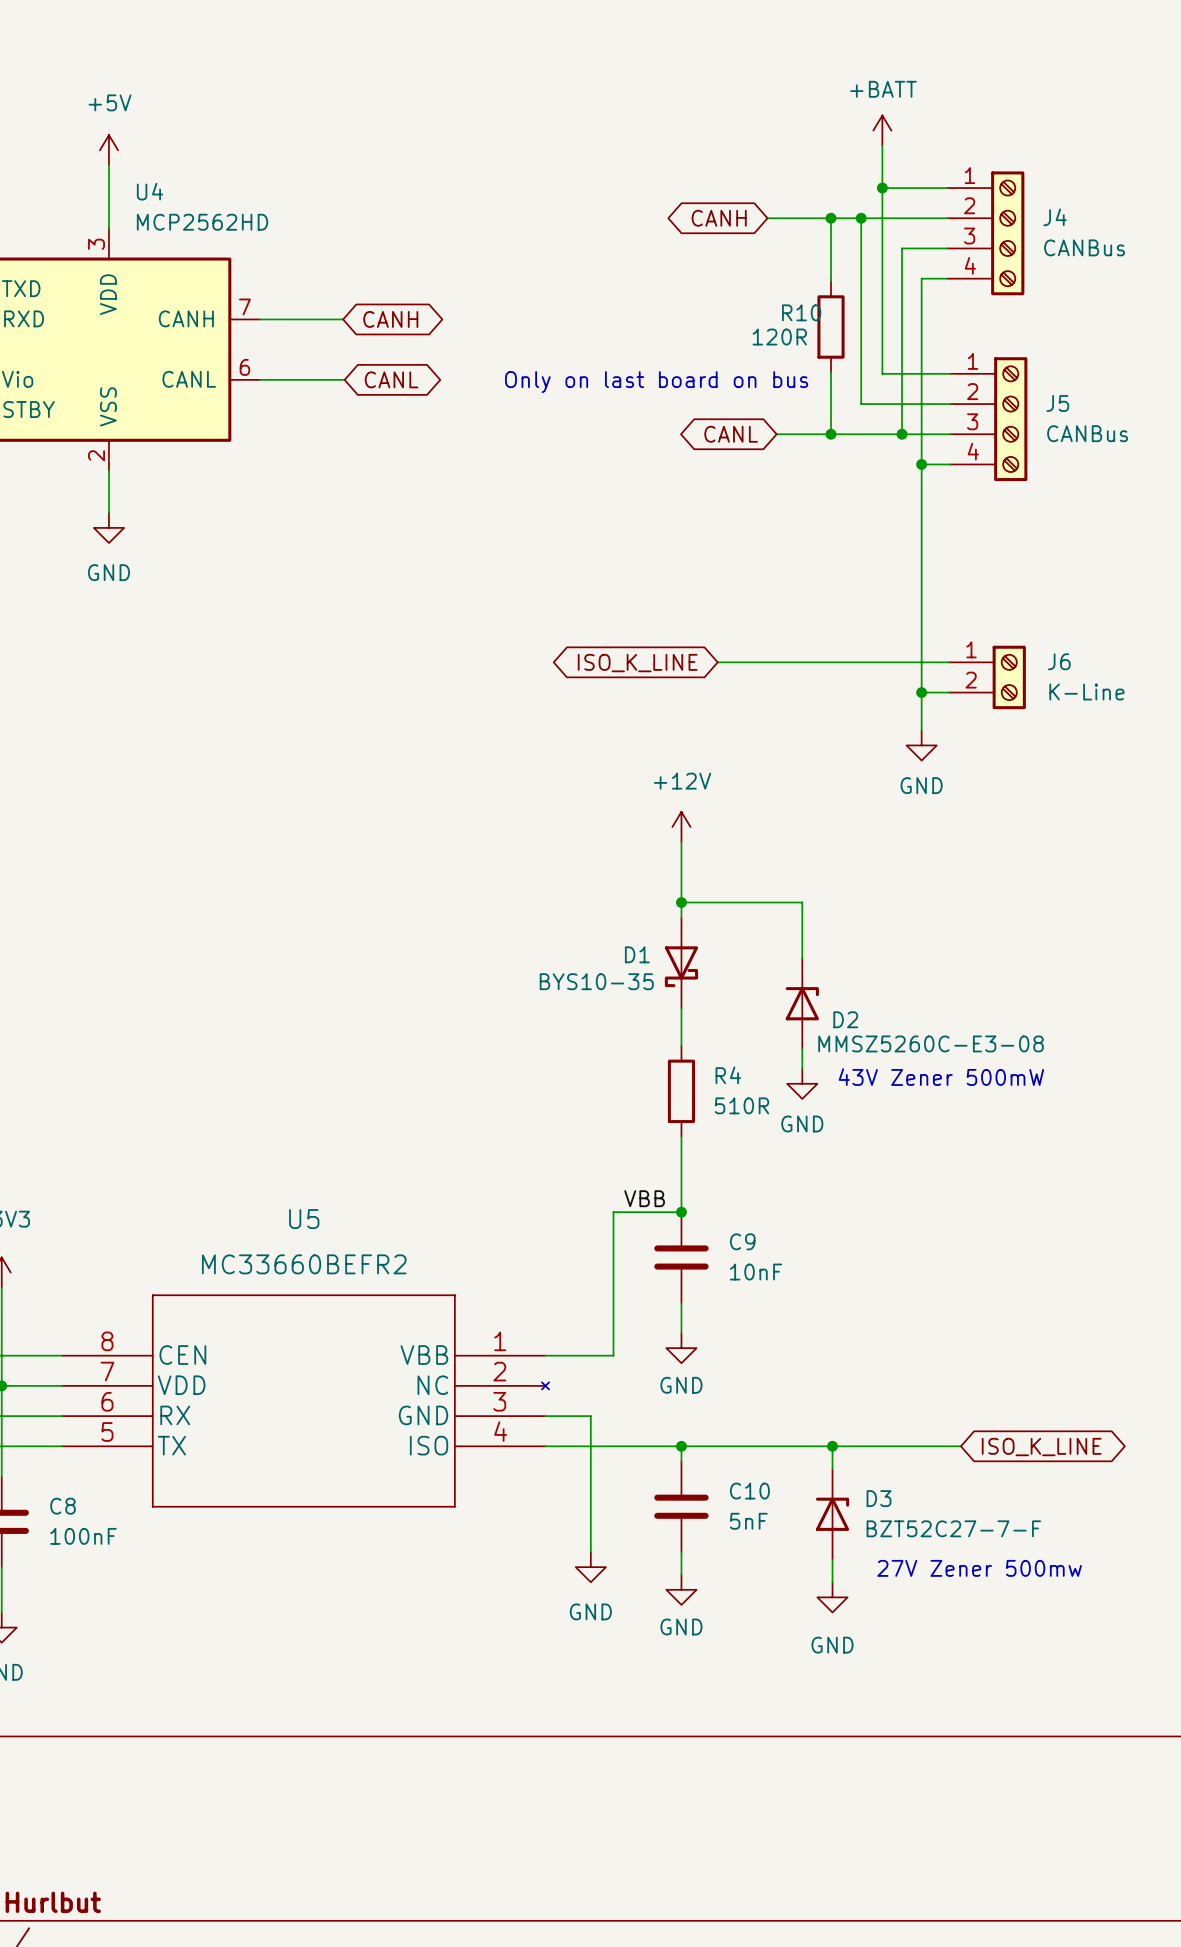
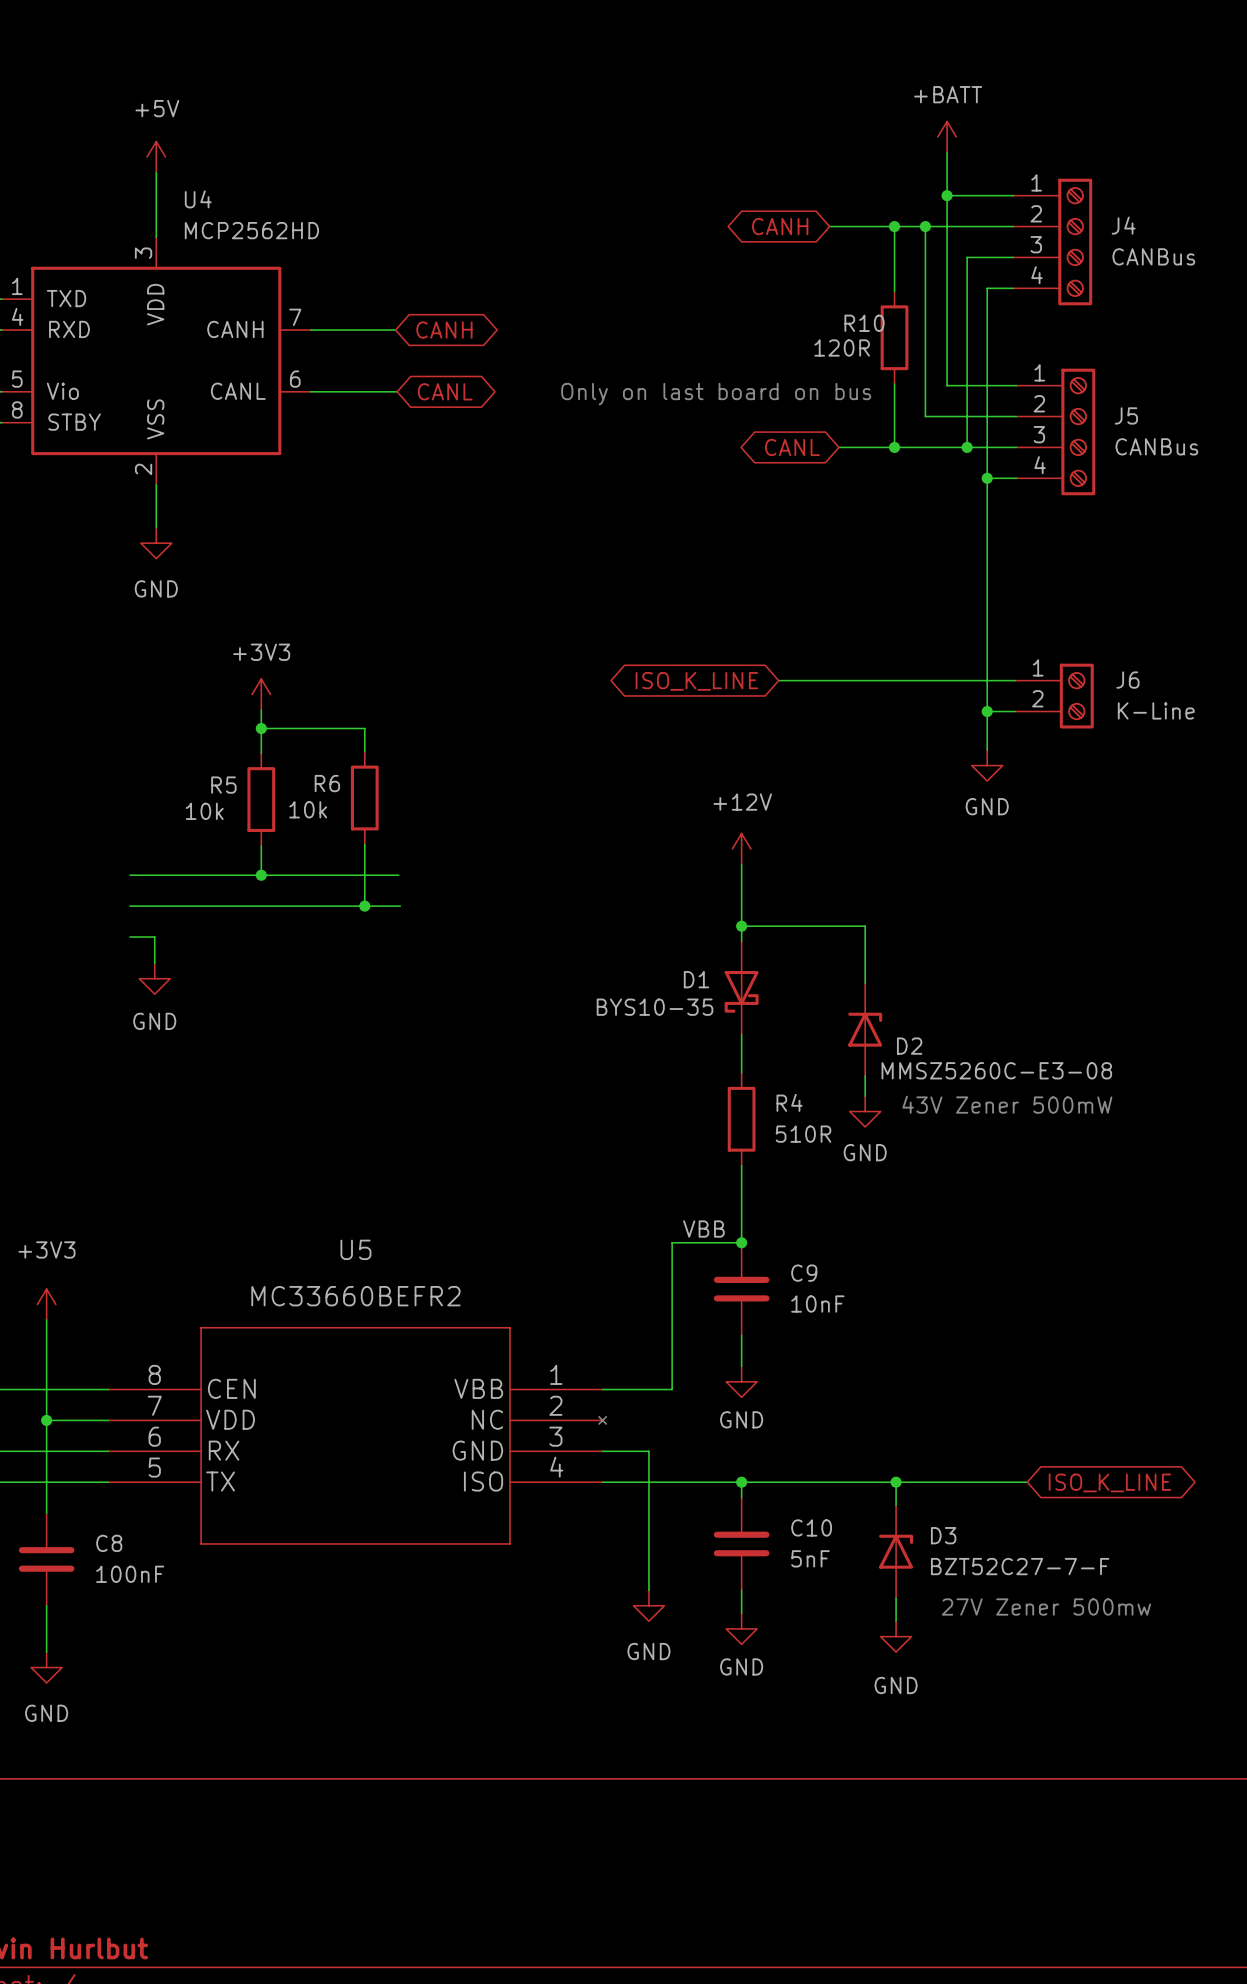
power symbol: none -> +3V3 (261, 694)
wire: none -> (261, 709) (261, 753)
wire: none -> (261, 728) (364, 728) (364, 751)
junction: none -> (261, 728)
R6: none -> 10k (364, 798)
R5: none -> 10k (261, 799)
wire: none -> (364, 844) (364, 906)
wire: none -> (261, 845) (261, 875)
wire: none -> (130, 875) (398, 875)
junction: none -> (261, 875)
wire: none -> (130, 906) (400, 906)
junction: none -> (364, 906)
wire: none -> (130, 937) (154, 937) (154, 963)
power symbol: none -> GND (154, 978)

